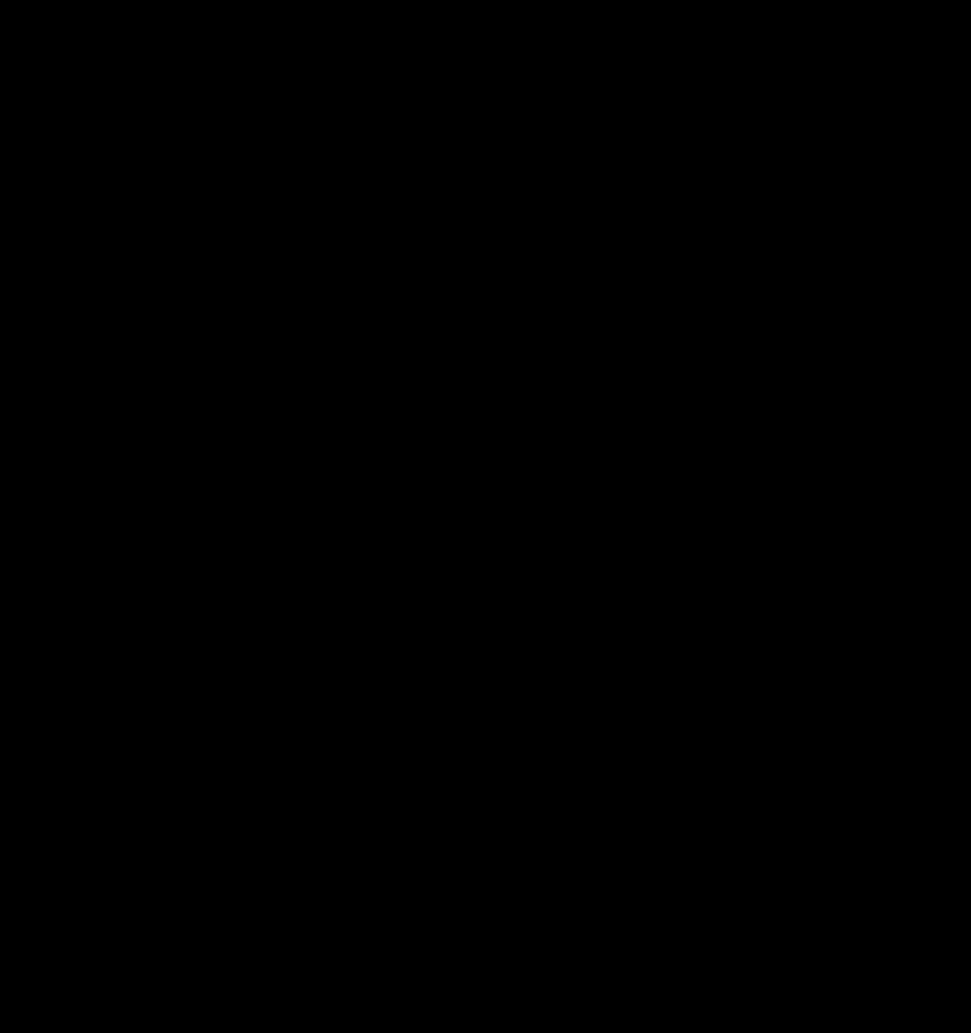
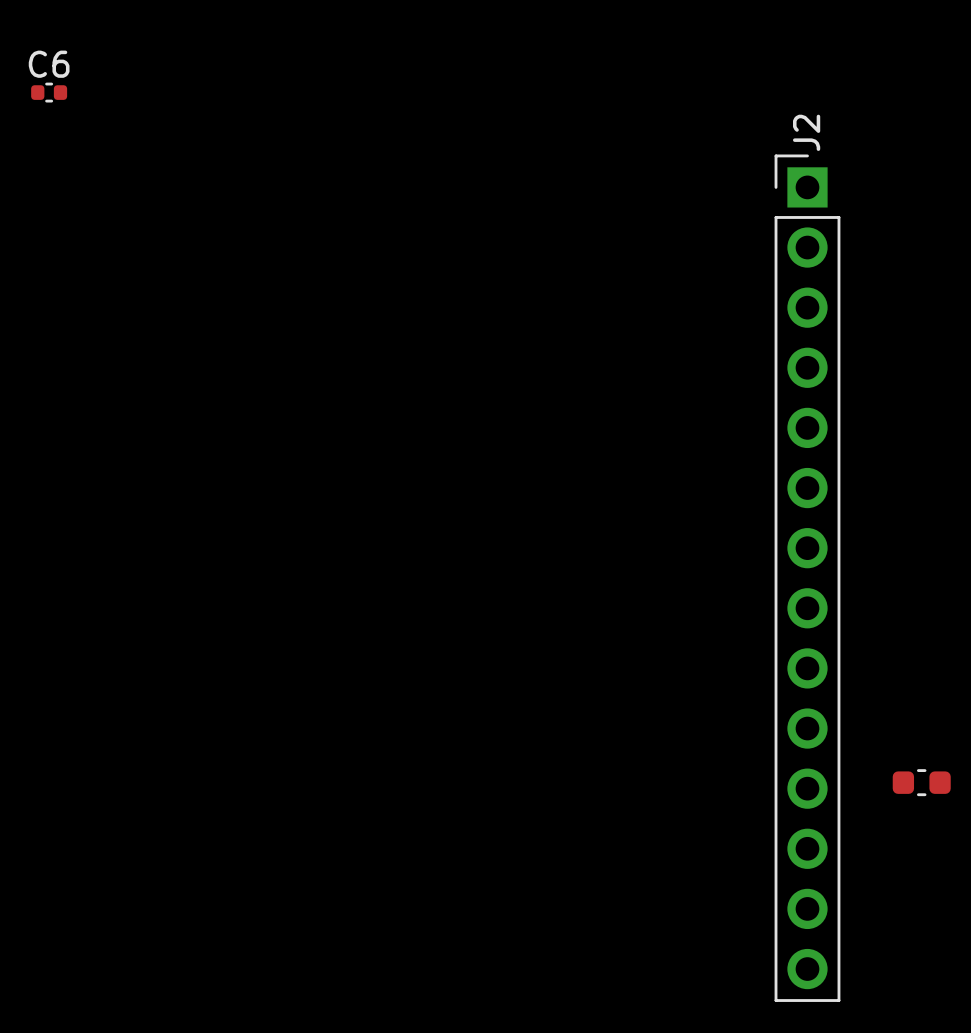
C6: none -> (49, 92)
J2: none -> (807, 578)
part: none -> (921, 782)

